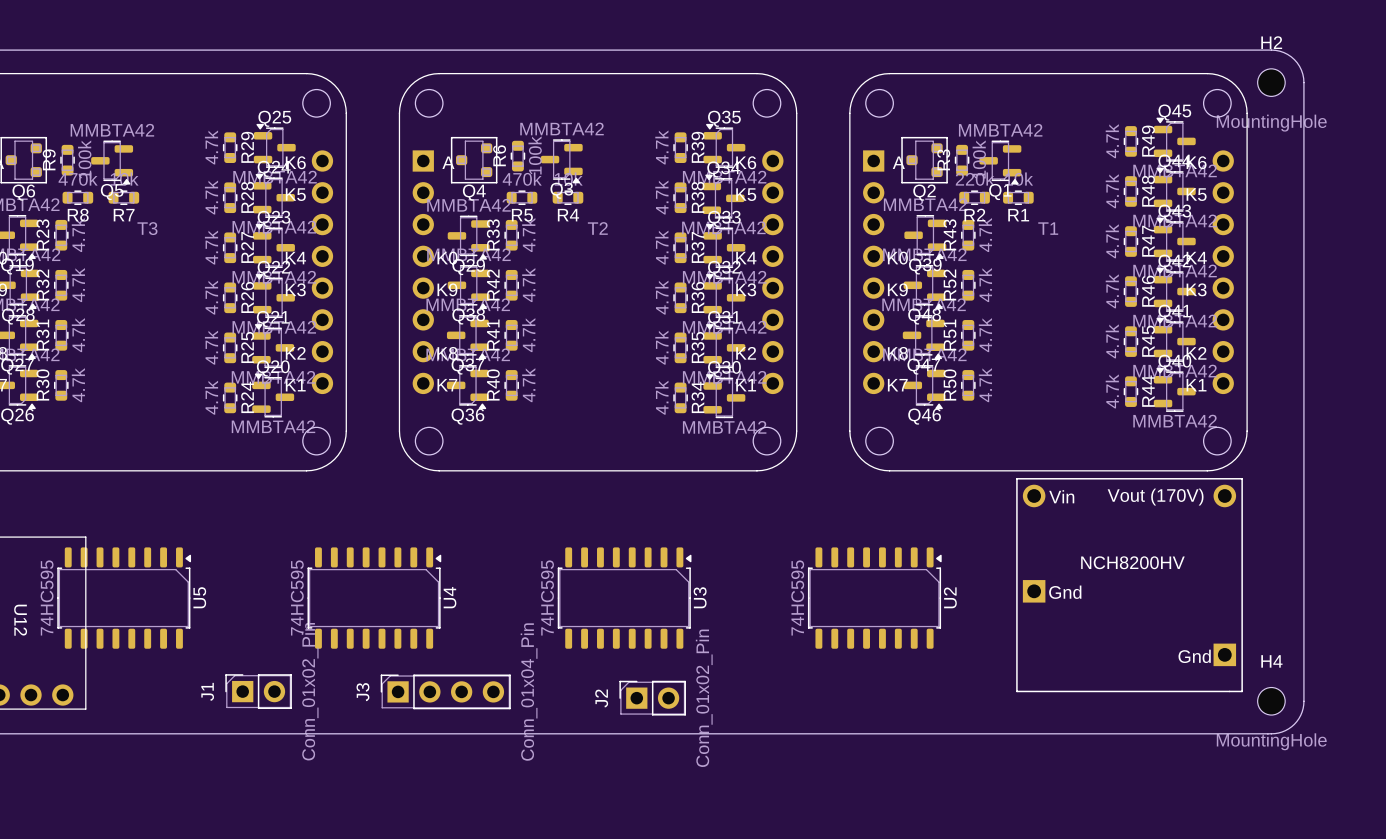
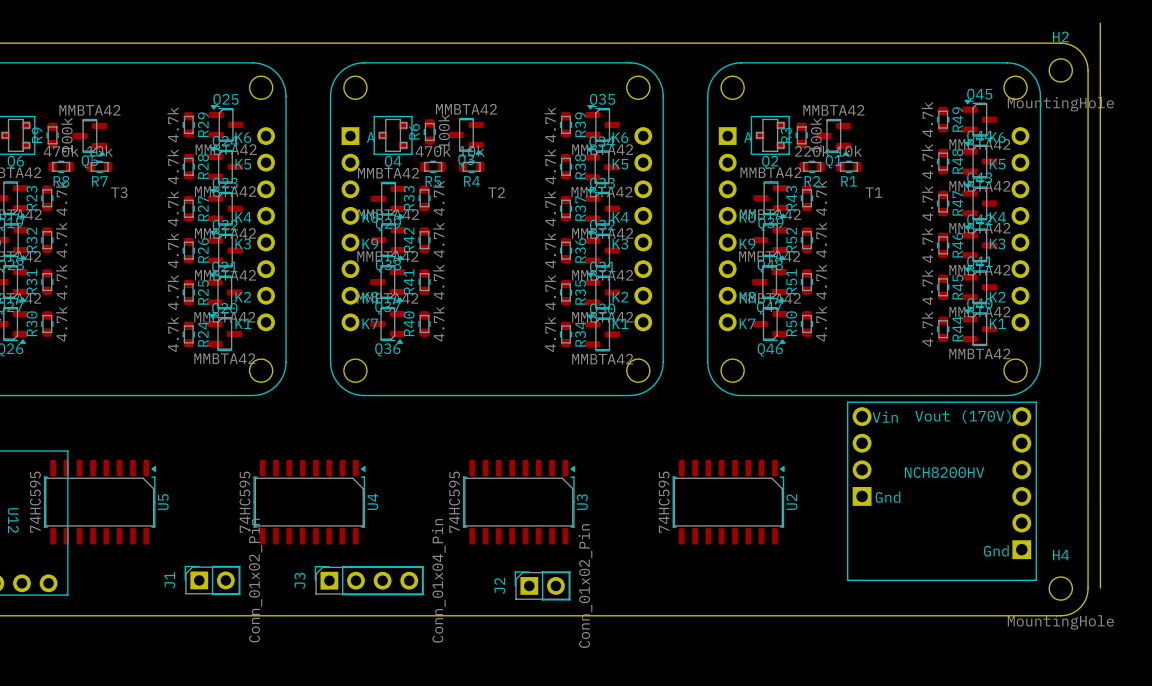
board edge: none -> (1100, 23) (1100, 588)
part footprint: [1016, 478, 1243, 693] -> [847, 401, 1037, 581]

